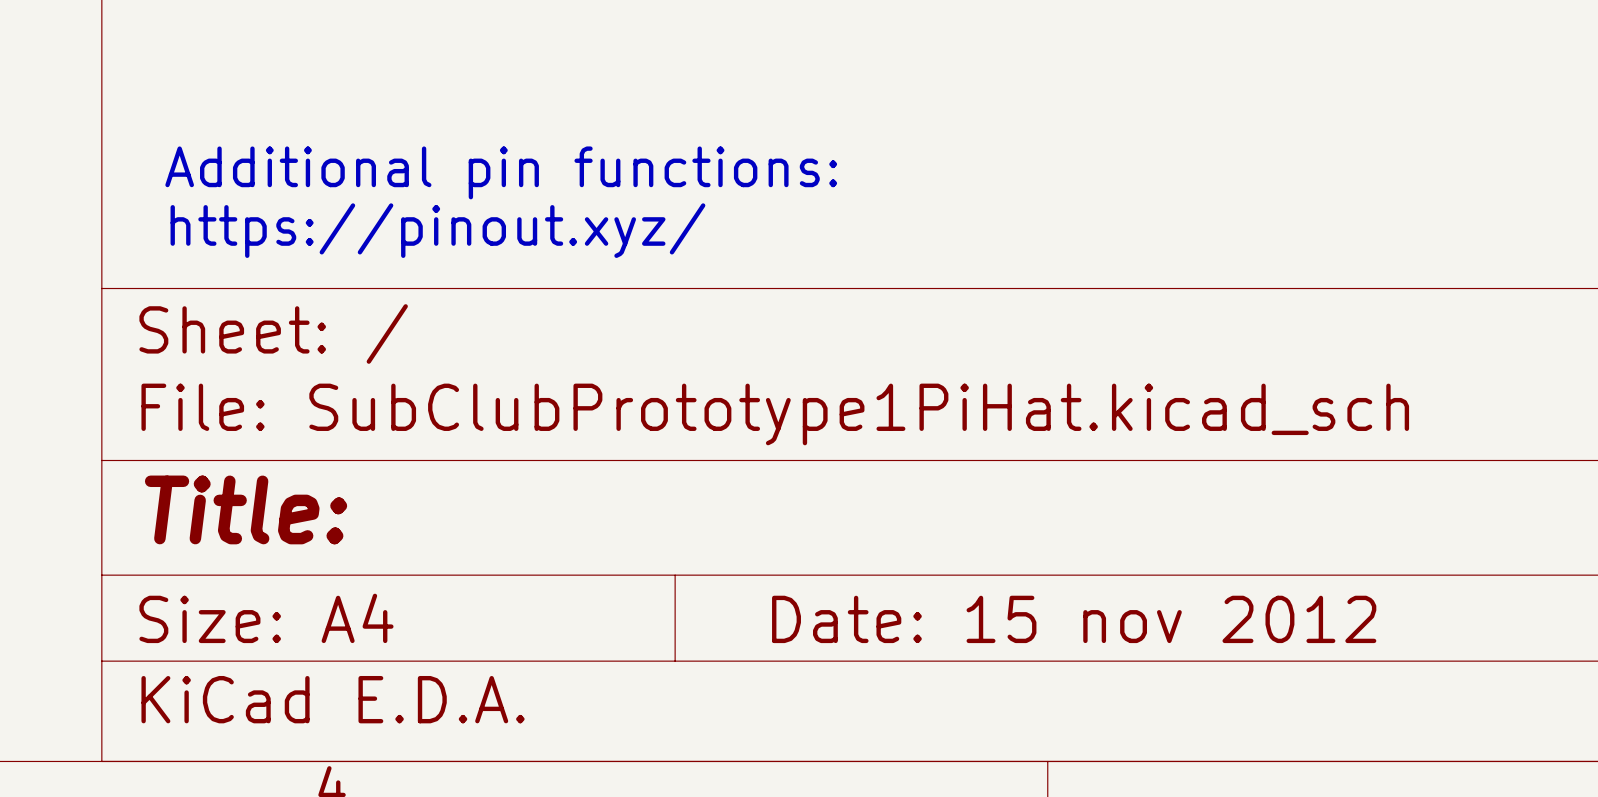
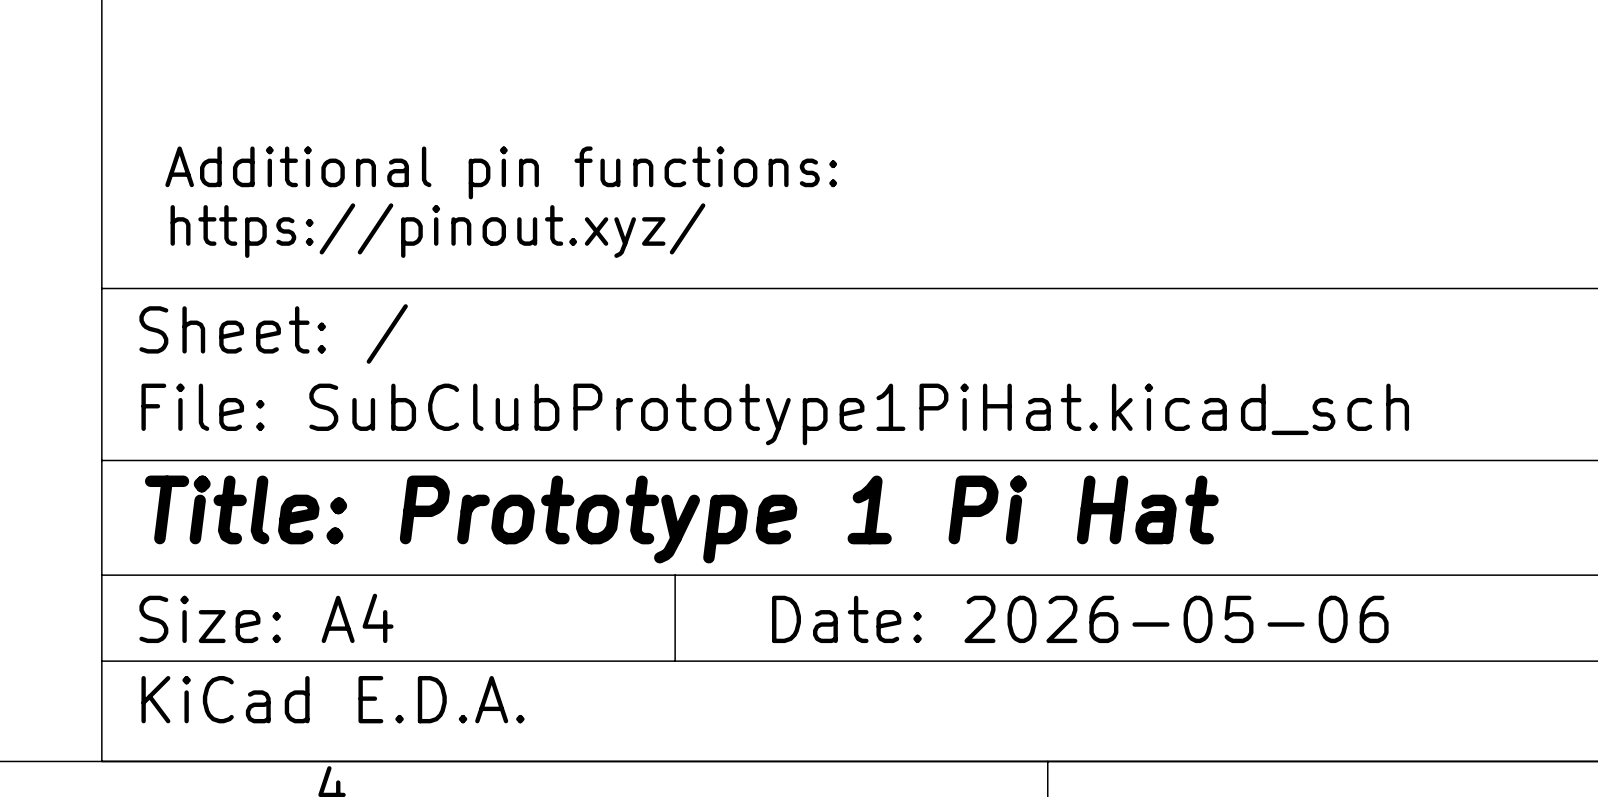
title block: Title: (246, 509) -> Title: Prototype 1 Pi Hat (681, 519)
title block: Date: 15 nov 2012 (1074, 619) -> Date: 2026-05-06 (1080, 619)

